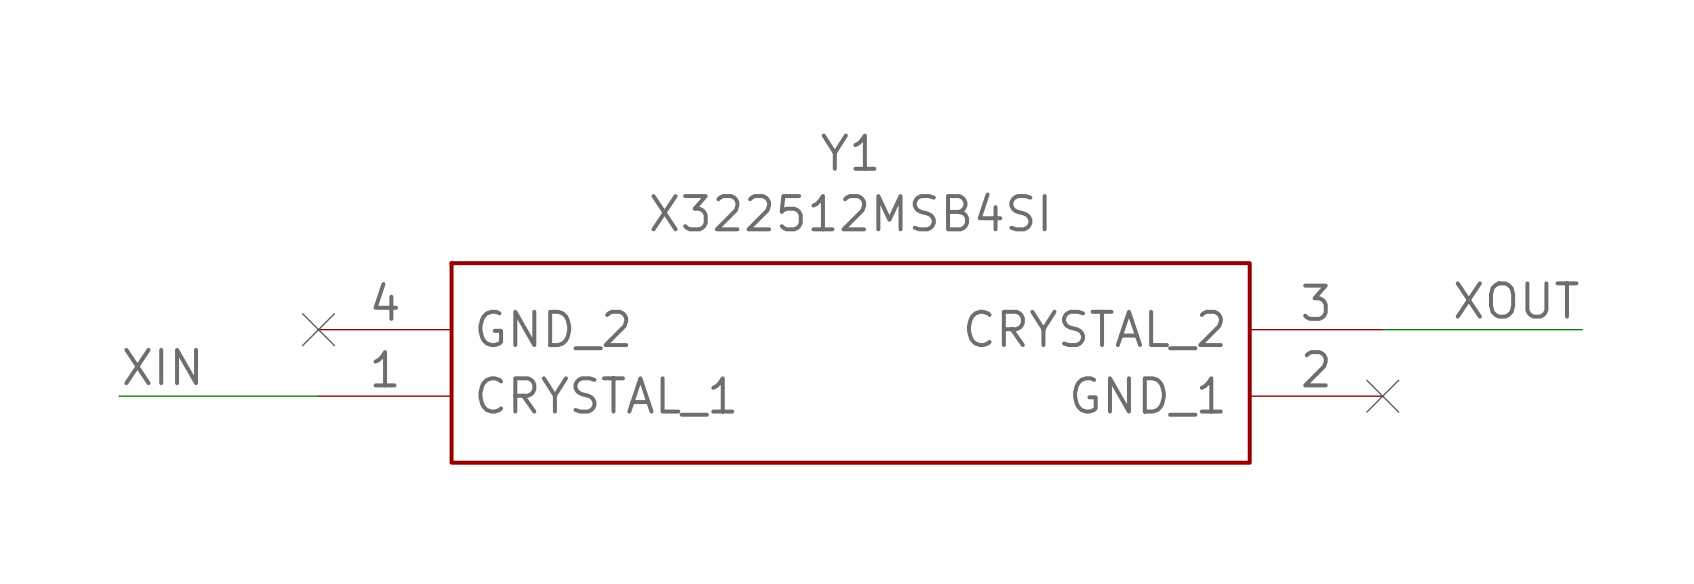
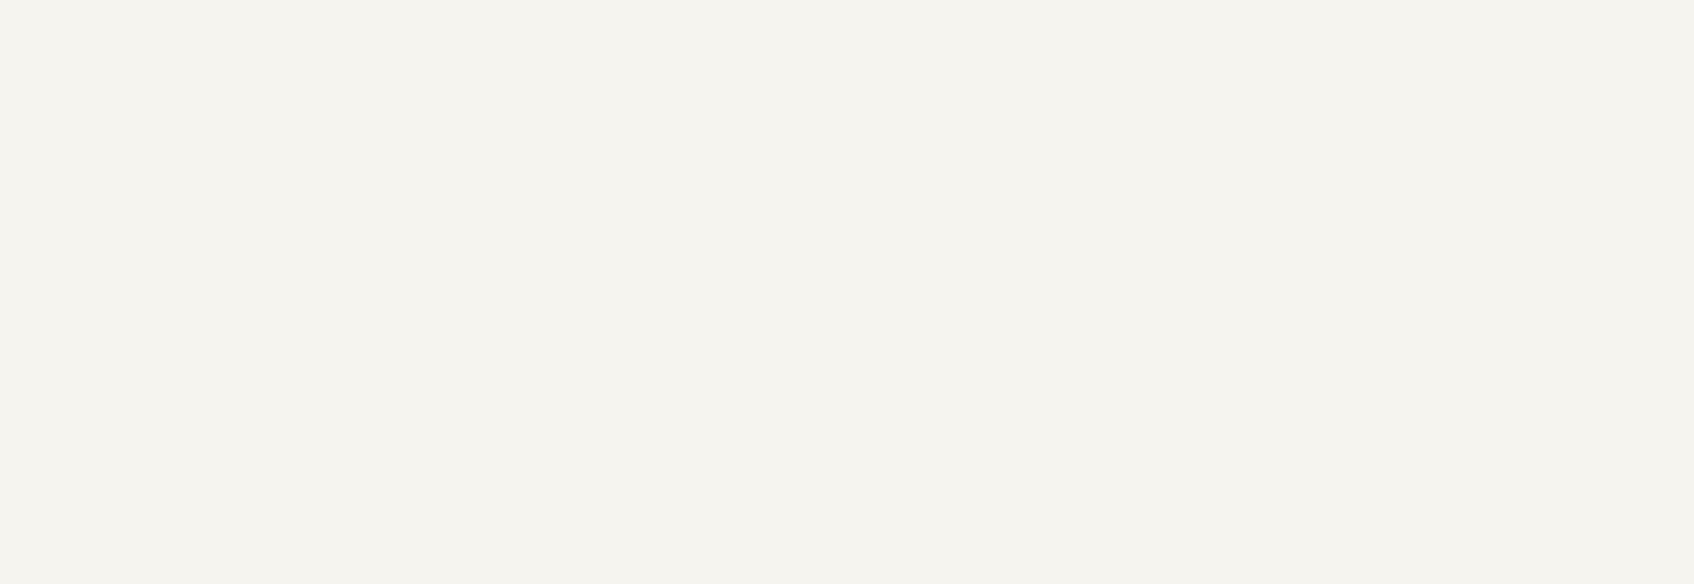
label: XOUT (1517, 299) -> none
no-connect mark: (318, 329) -> none
wire: (1382, 329) (1582, 329) -> none
Y1: X322512MSB4SI (850, 362) -> none
label: XIN (161, 366) -> none
wire: (118, 396) (318, 396) -> none
no-connect mark: (1382, 396) -> none

